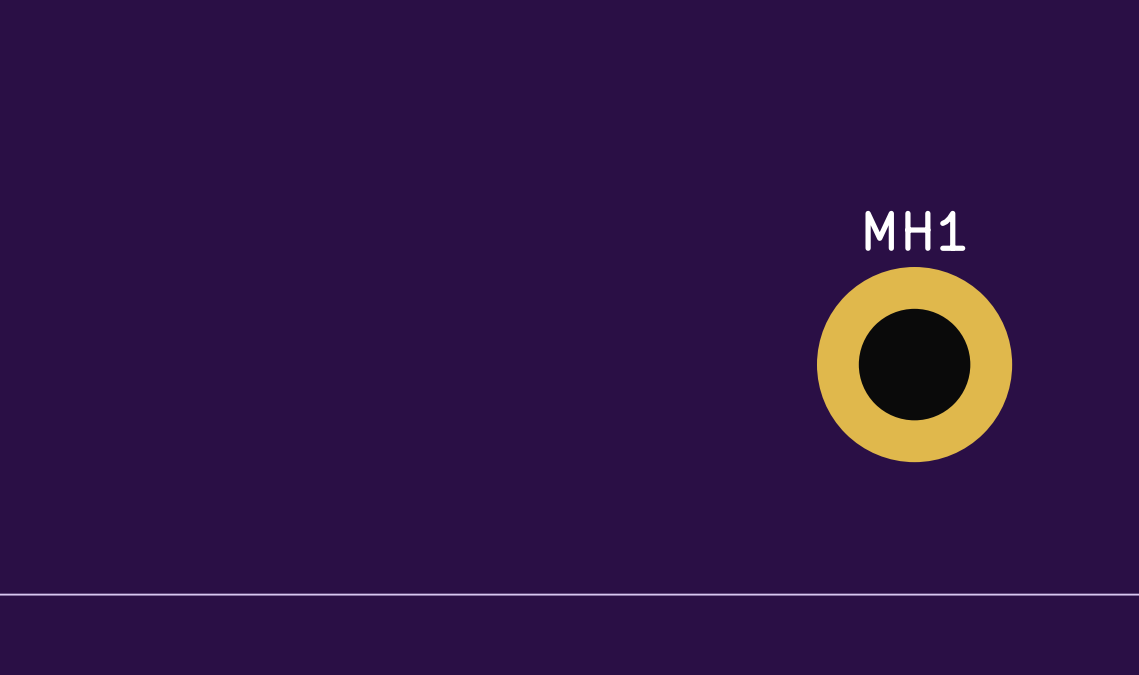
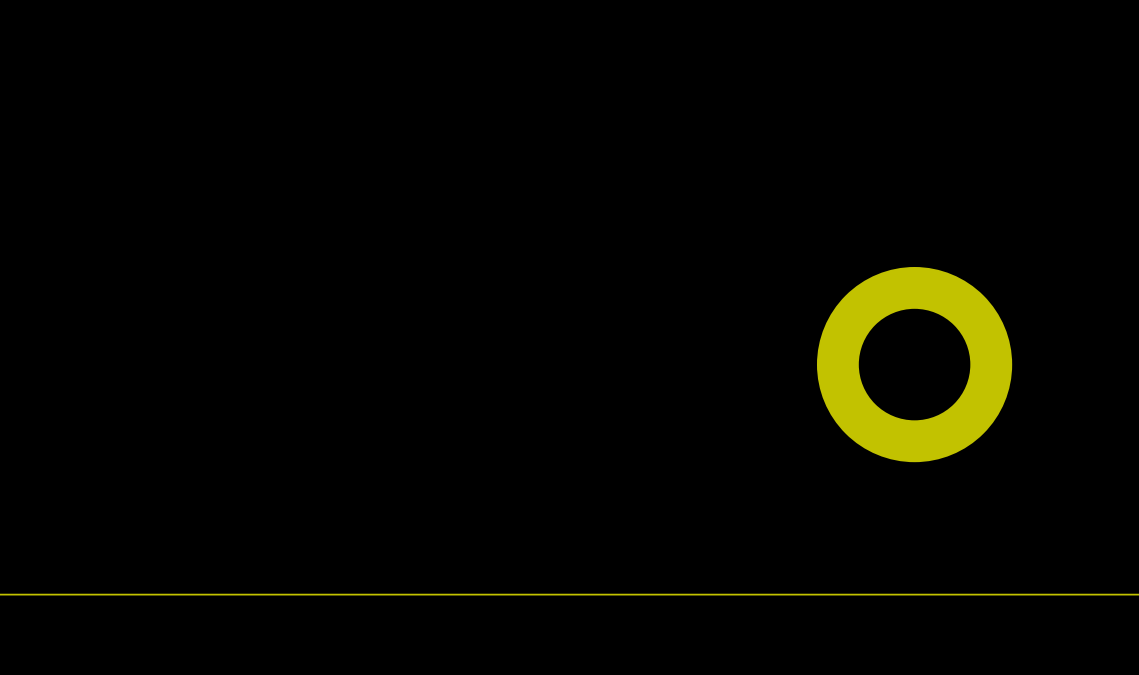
MH1 name: MH1 (915, 230) -> none

